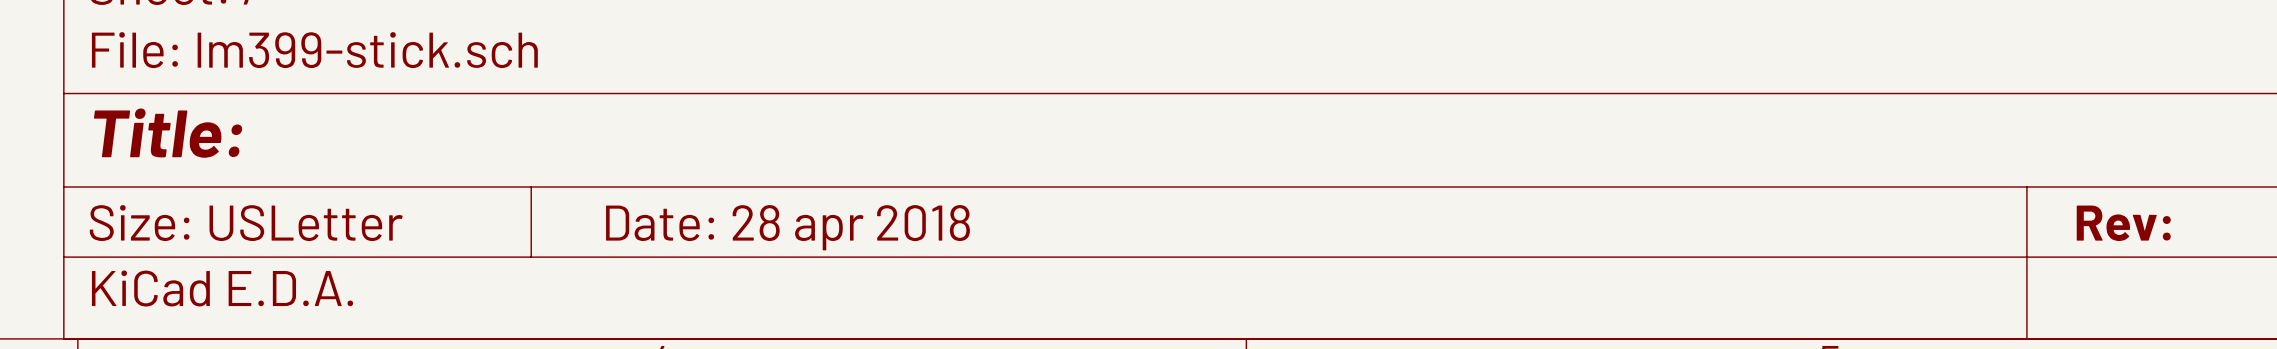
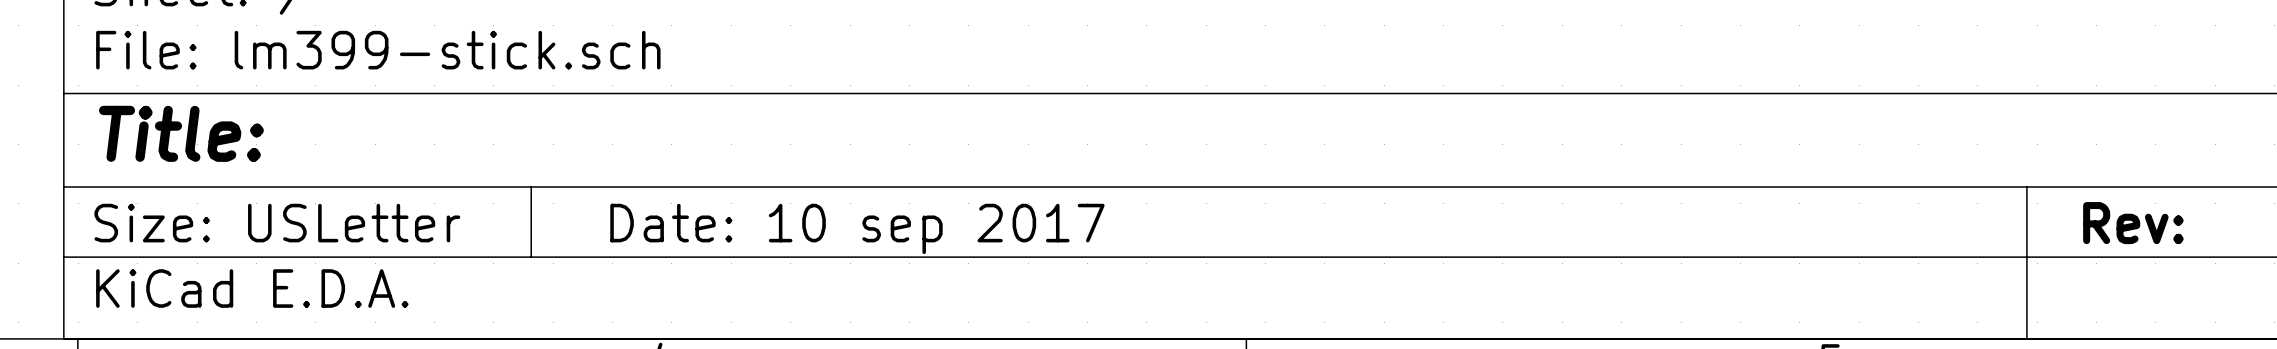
title block: Date: 28 apr 2018 (788, 227) -> Date: 10 sep 2017 (857, 228)

